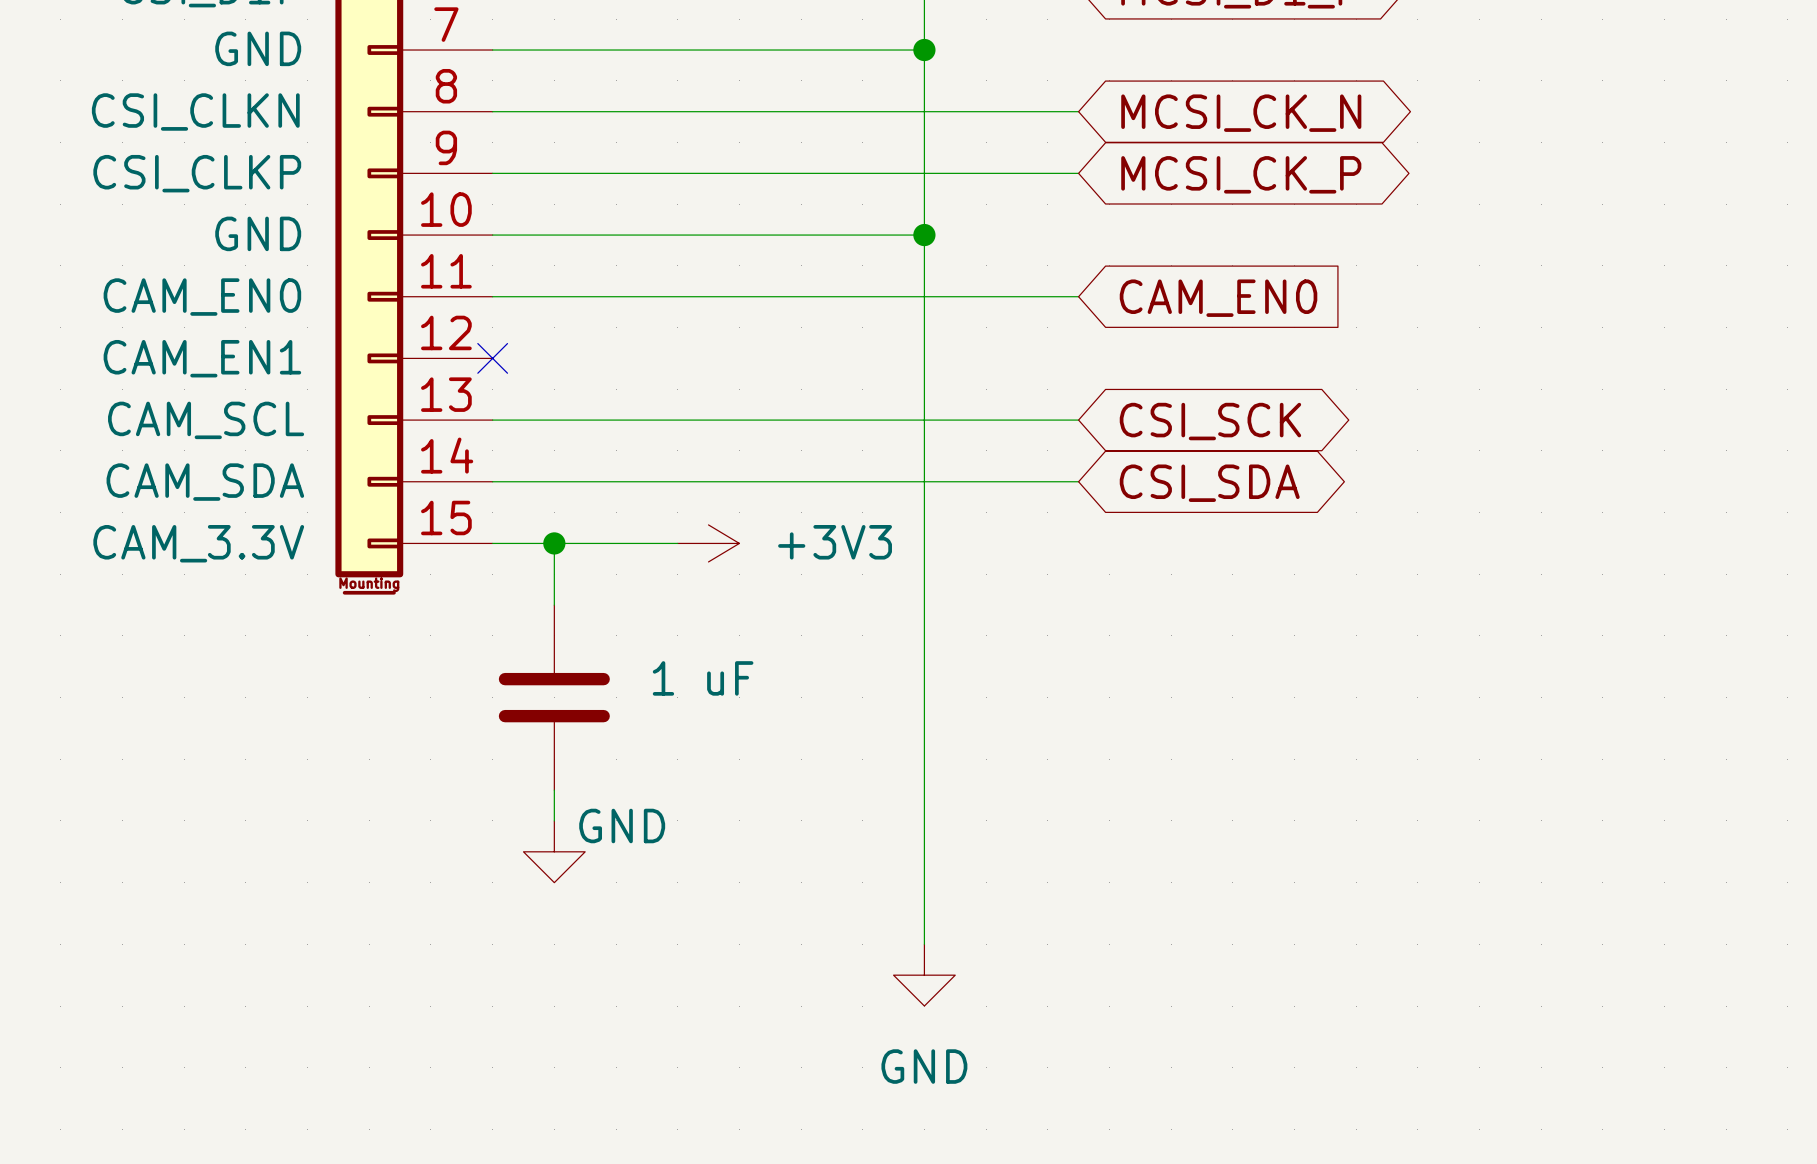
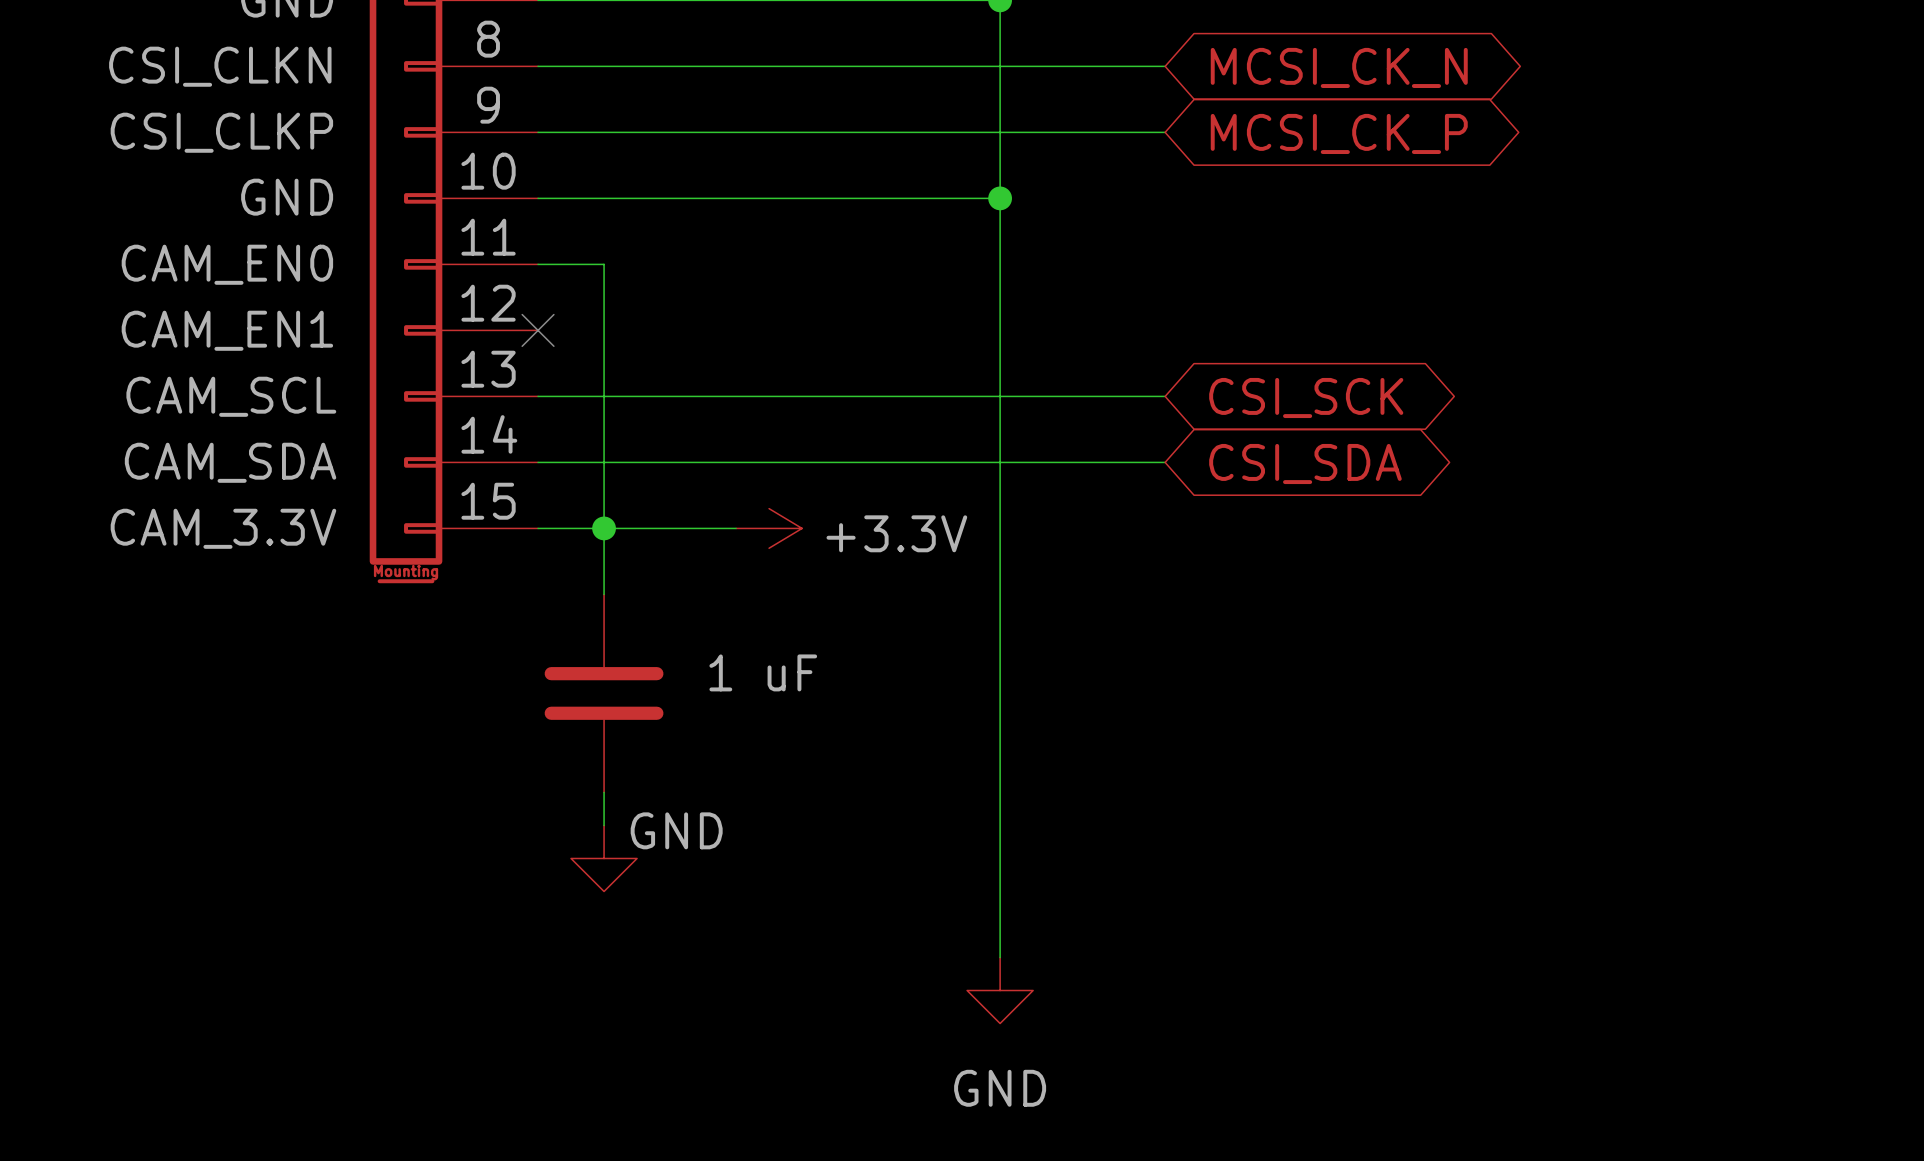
wire: (554, 296) (1078, 296) -> (604, 264) (604, 528)
global label: CAM_EN0 (1218, 298) -> none
power symbol: +3V3 (708, 543) -> +3.3V (769, 528)

